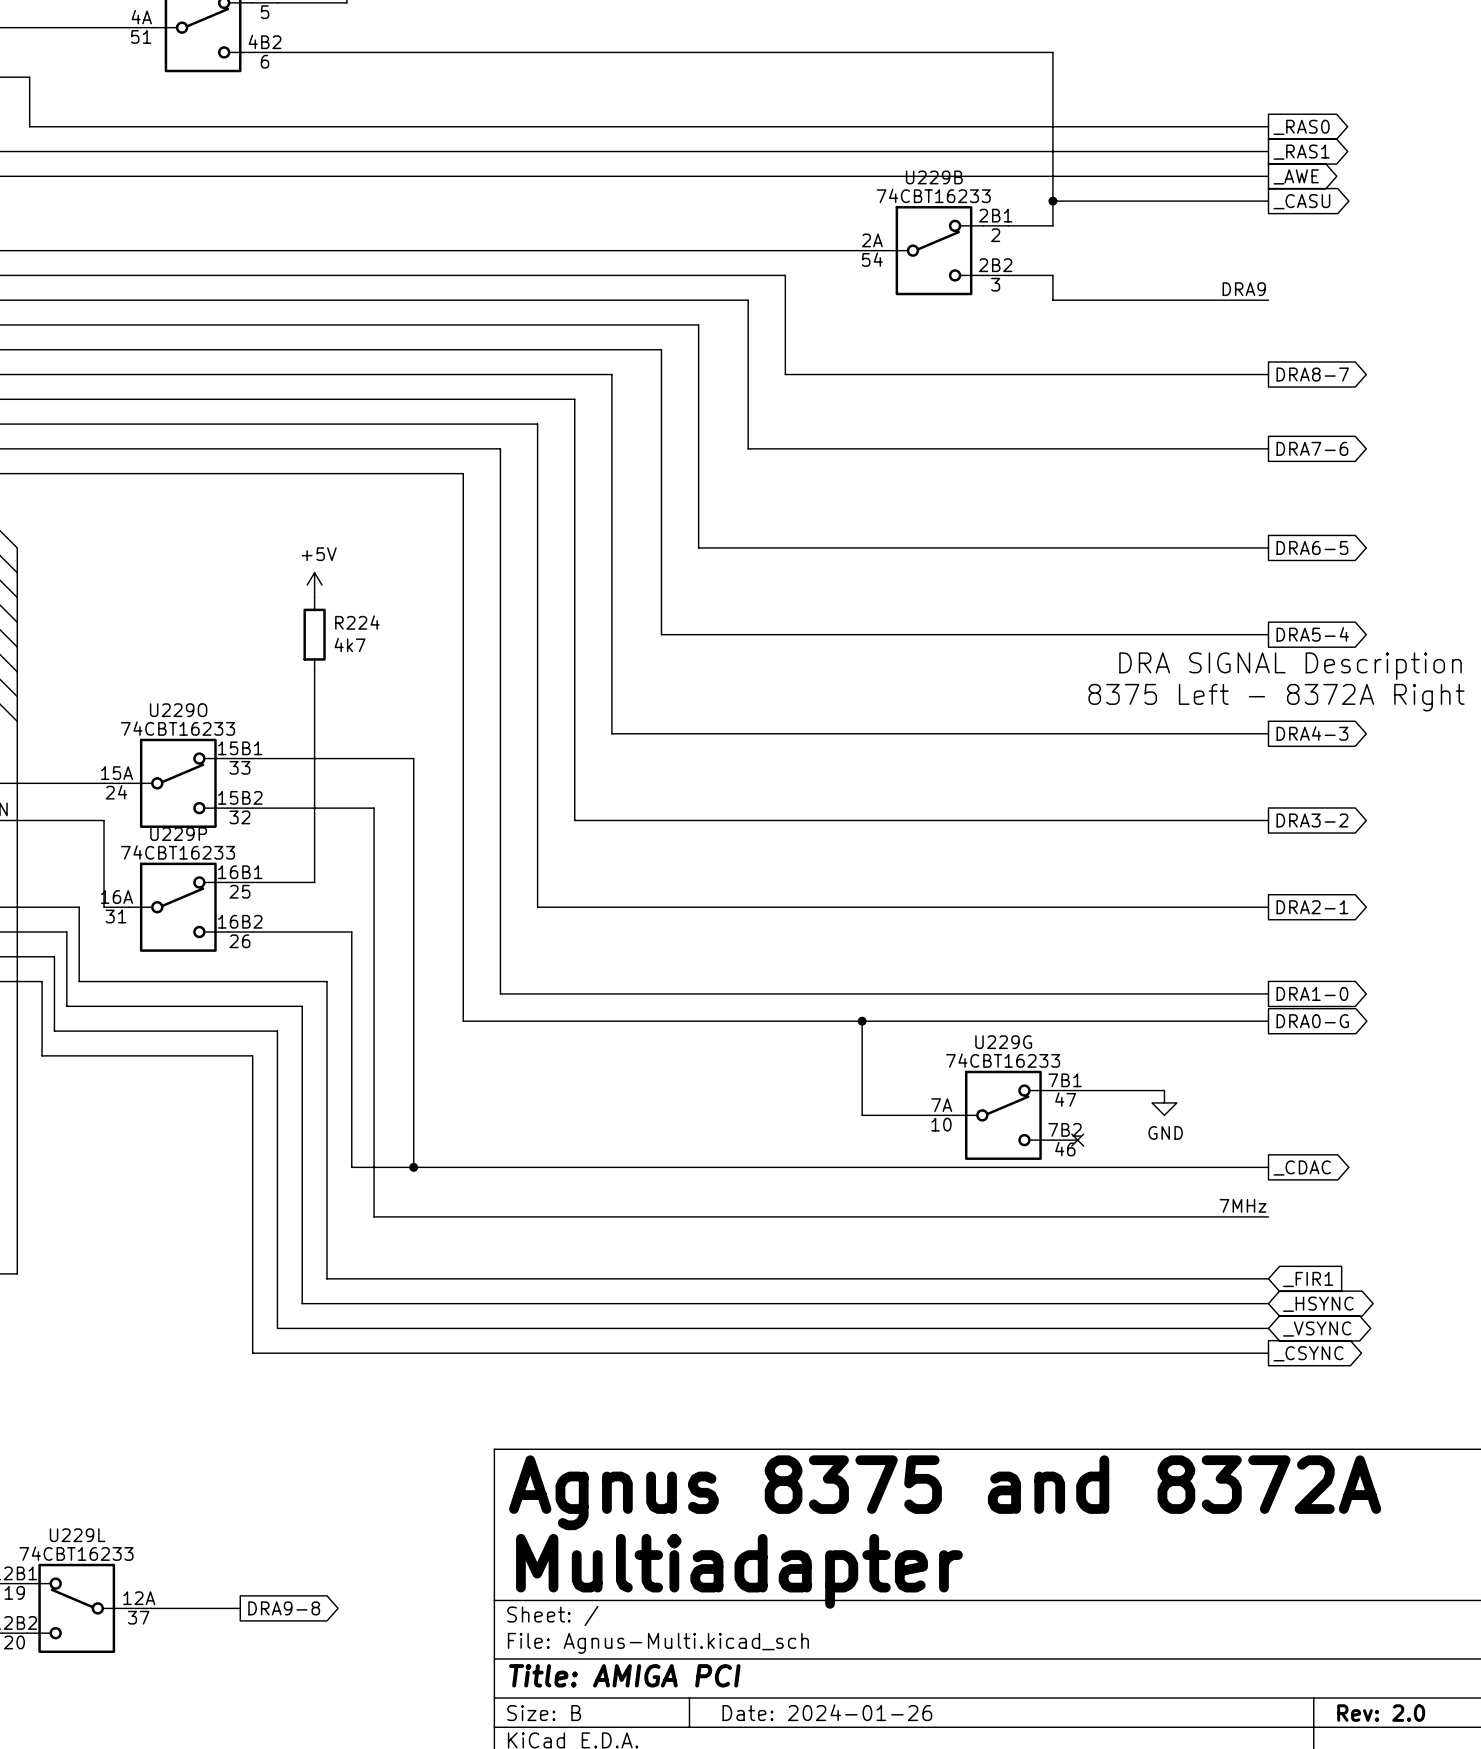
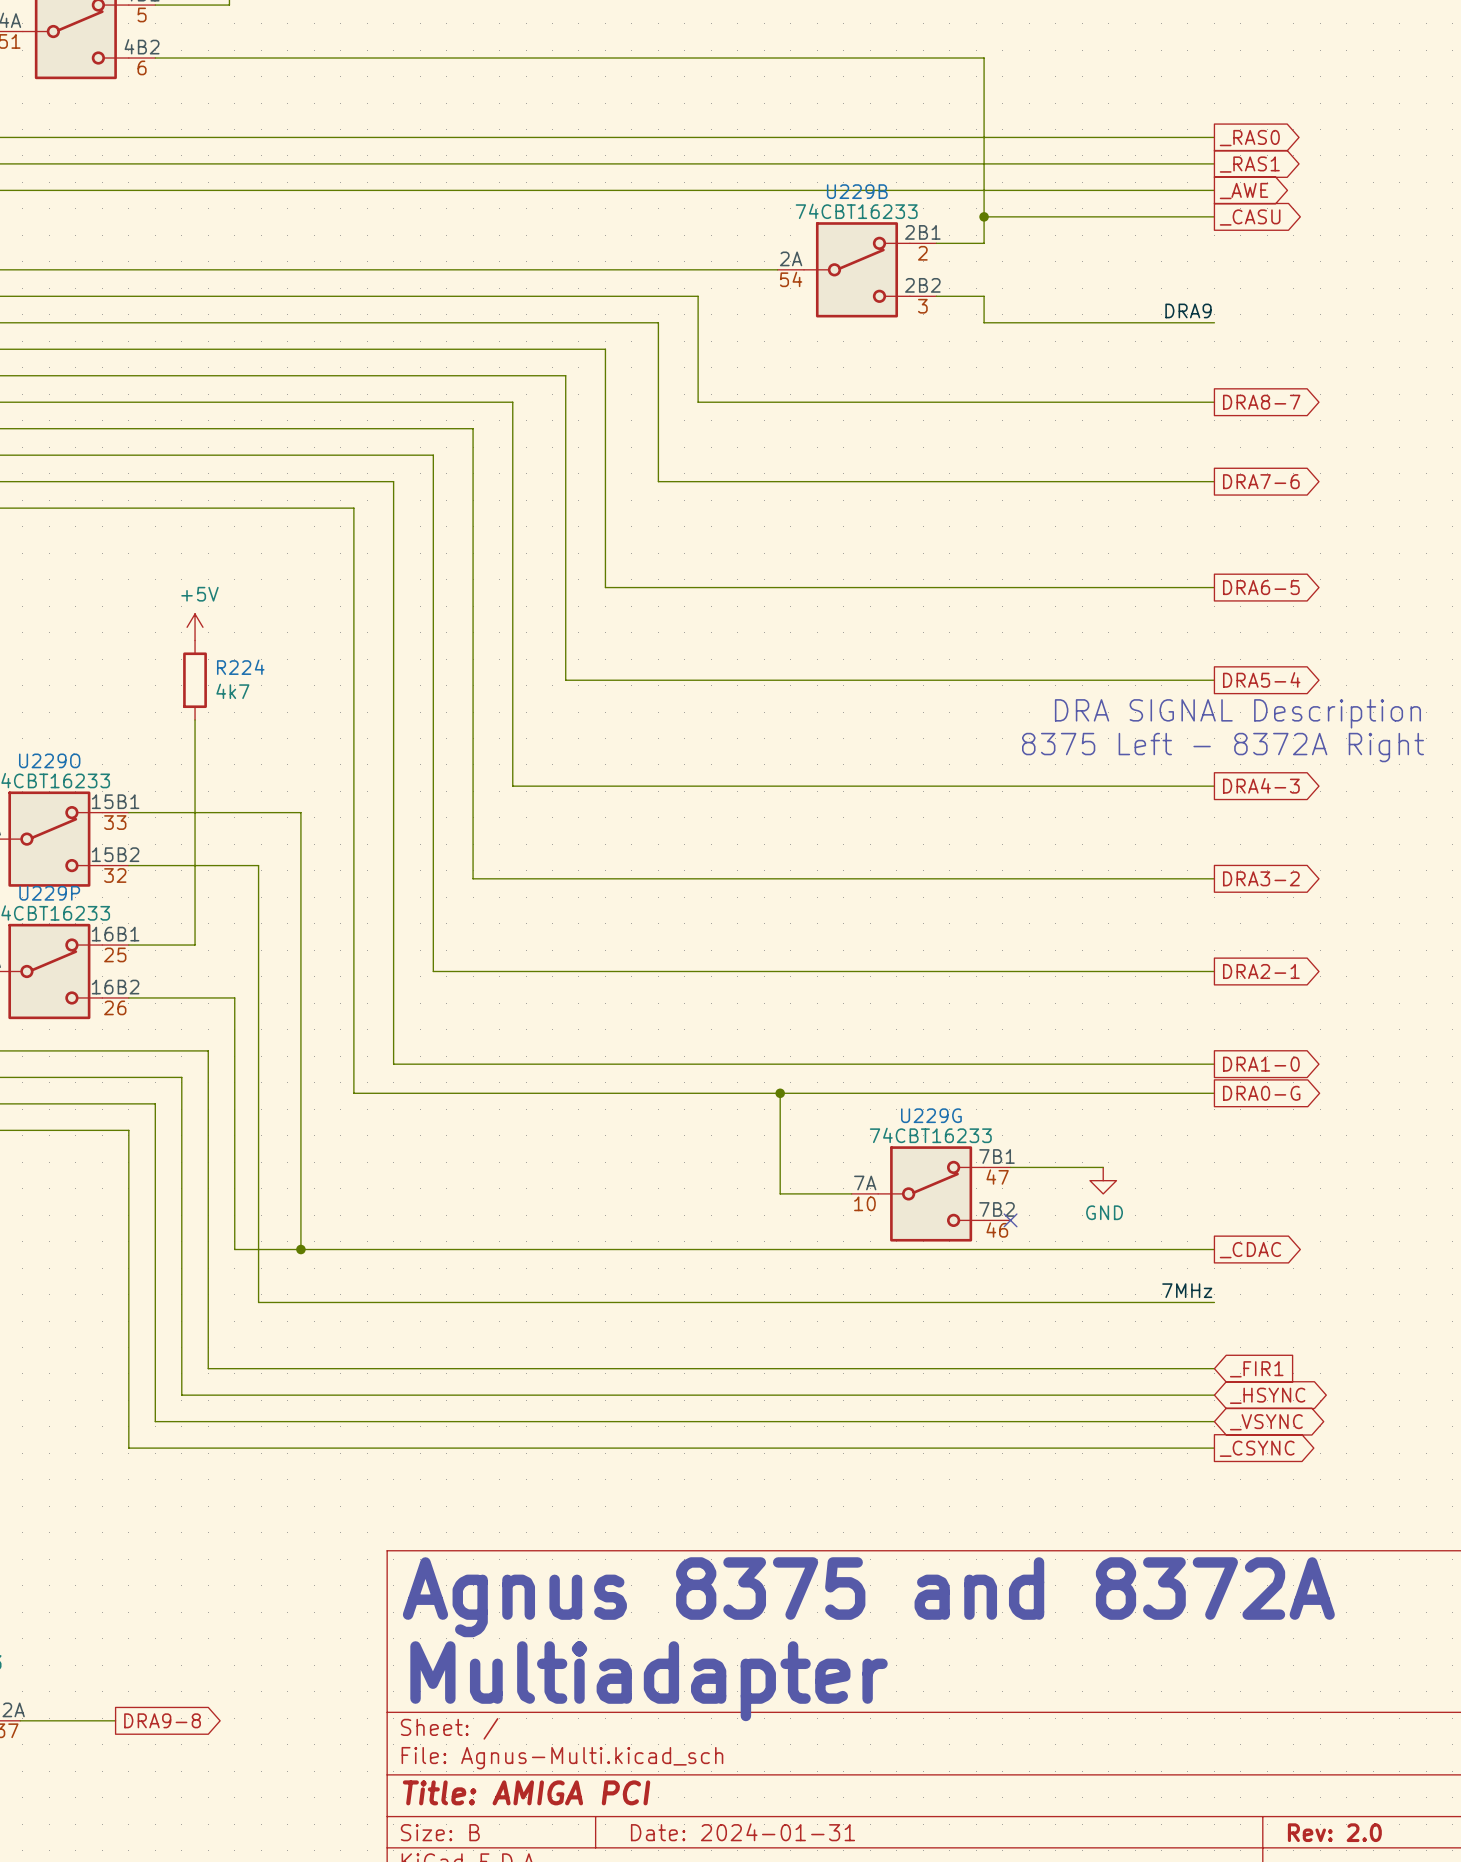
title block: Date: 2024-01-26 (827, 1712) -> Date: 2024-01-31 (742, 1832)

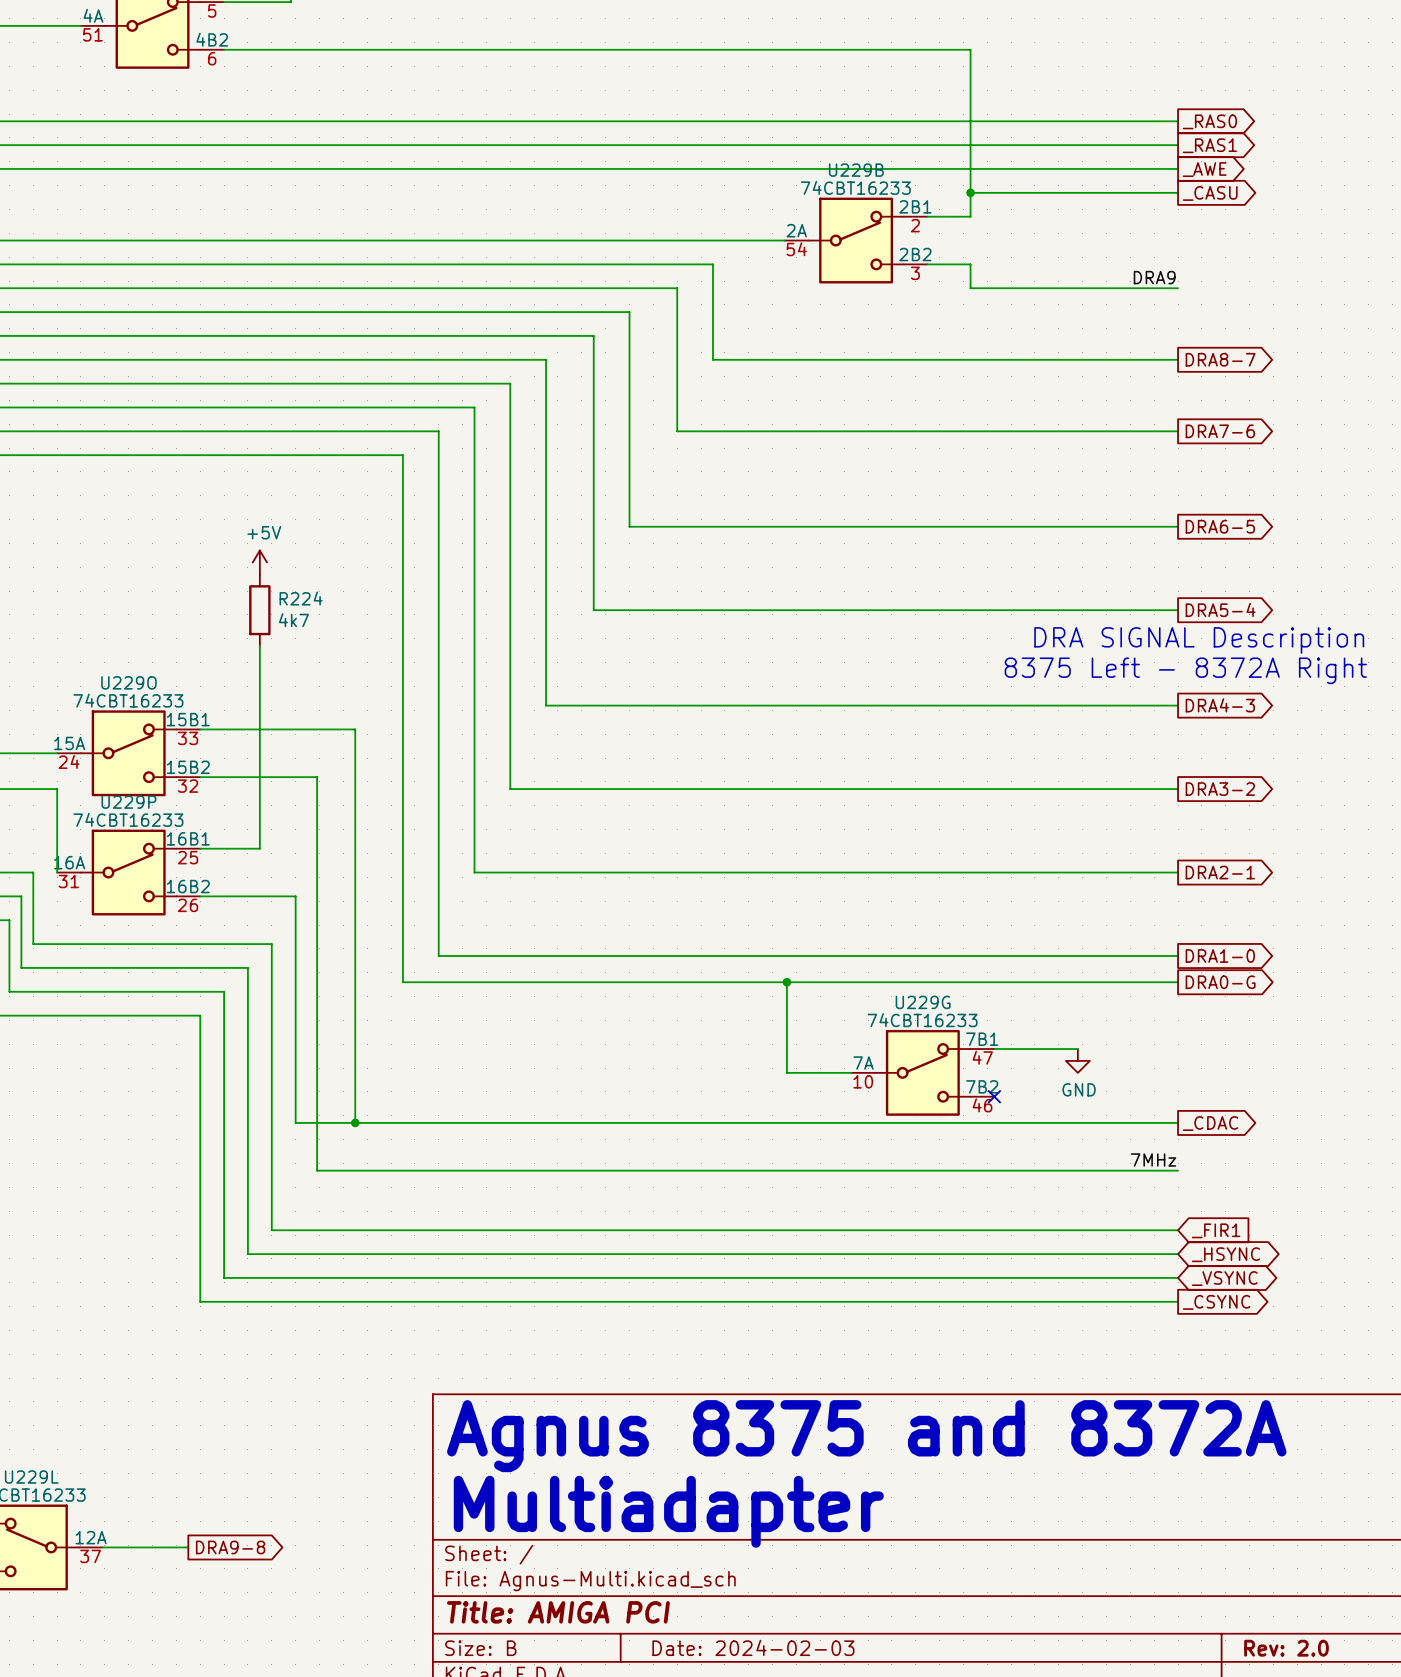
title block: Date: 2024-01-31 (742, 1832) -> Date: 2024-02-03 (753, 1647)

